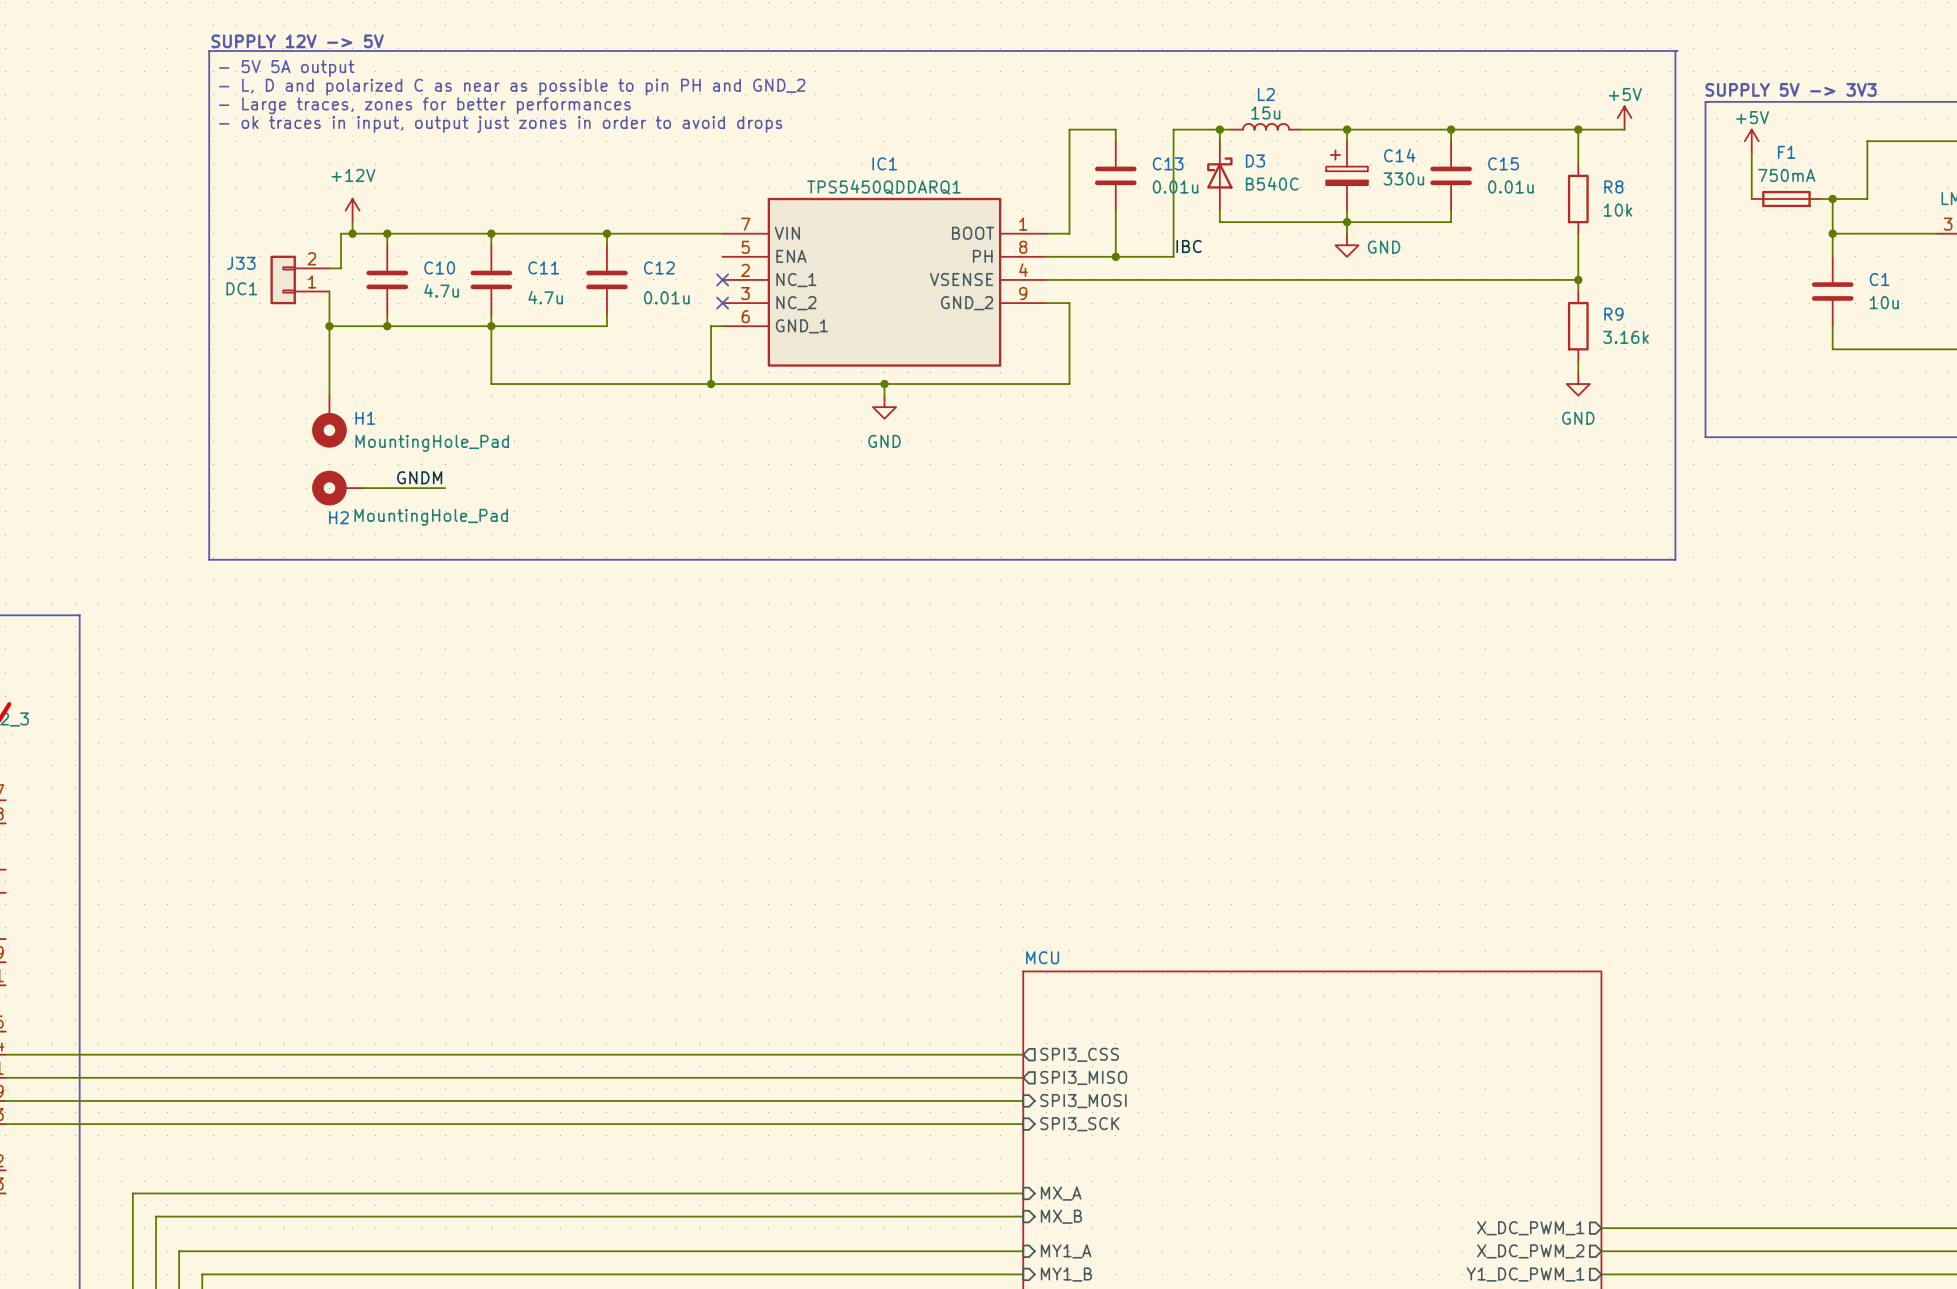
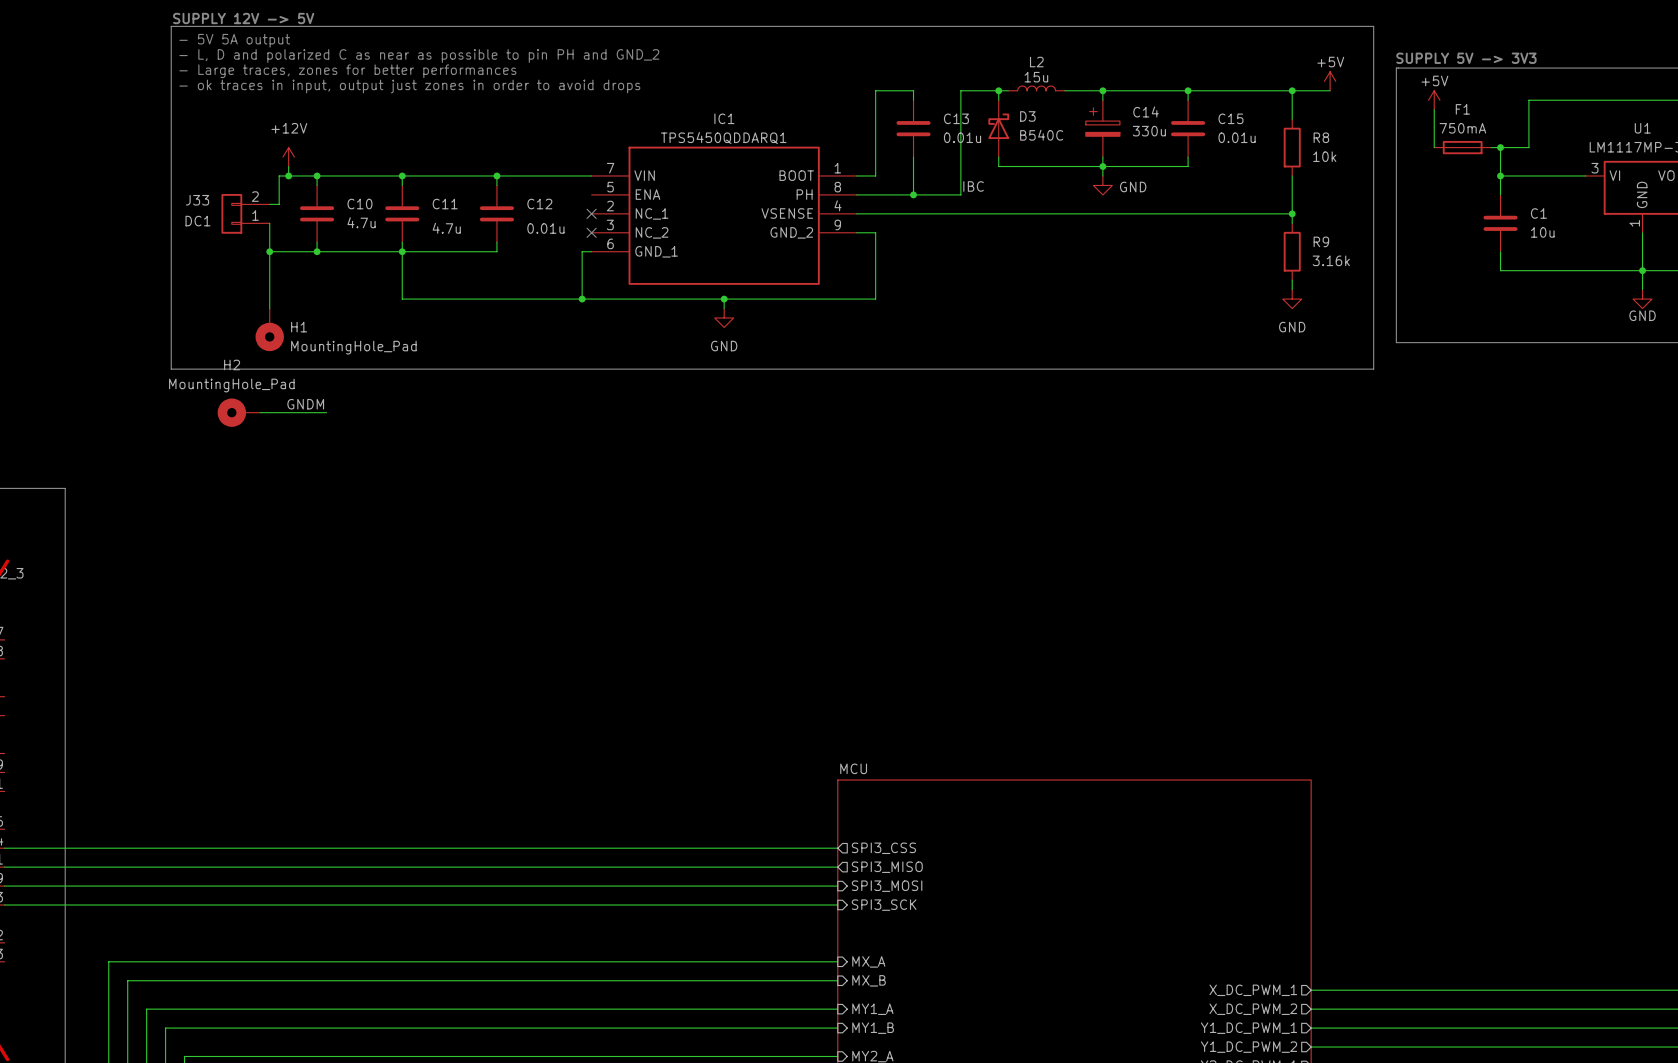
line: (1675, 50) (1675, 559) (209, 559) (209, 469) -> (1373, 26) (1373, 369) (171, 369)
label position: GNDM (419, 477) -> GNDM (305, 404)
H2 position: (338, 488) -> (238, 412)
wire: (364, 488) (445, 488) -> (260, 412) (326, 412)
H2 name position: H2 (338, 517) -> H2 (232, 364)
H2 value position: MountingHole_Pad (431, 517) -> MountingHole_Pad (231, 385)

